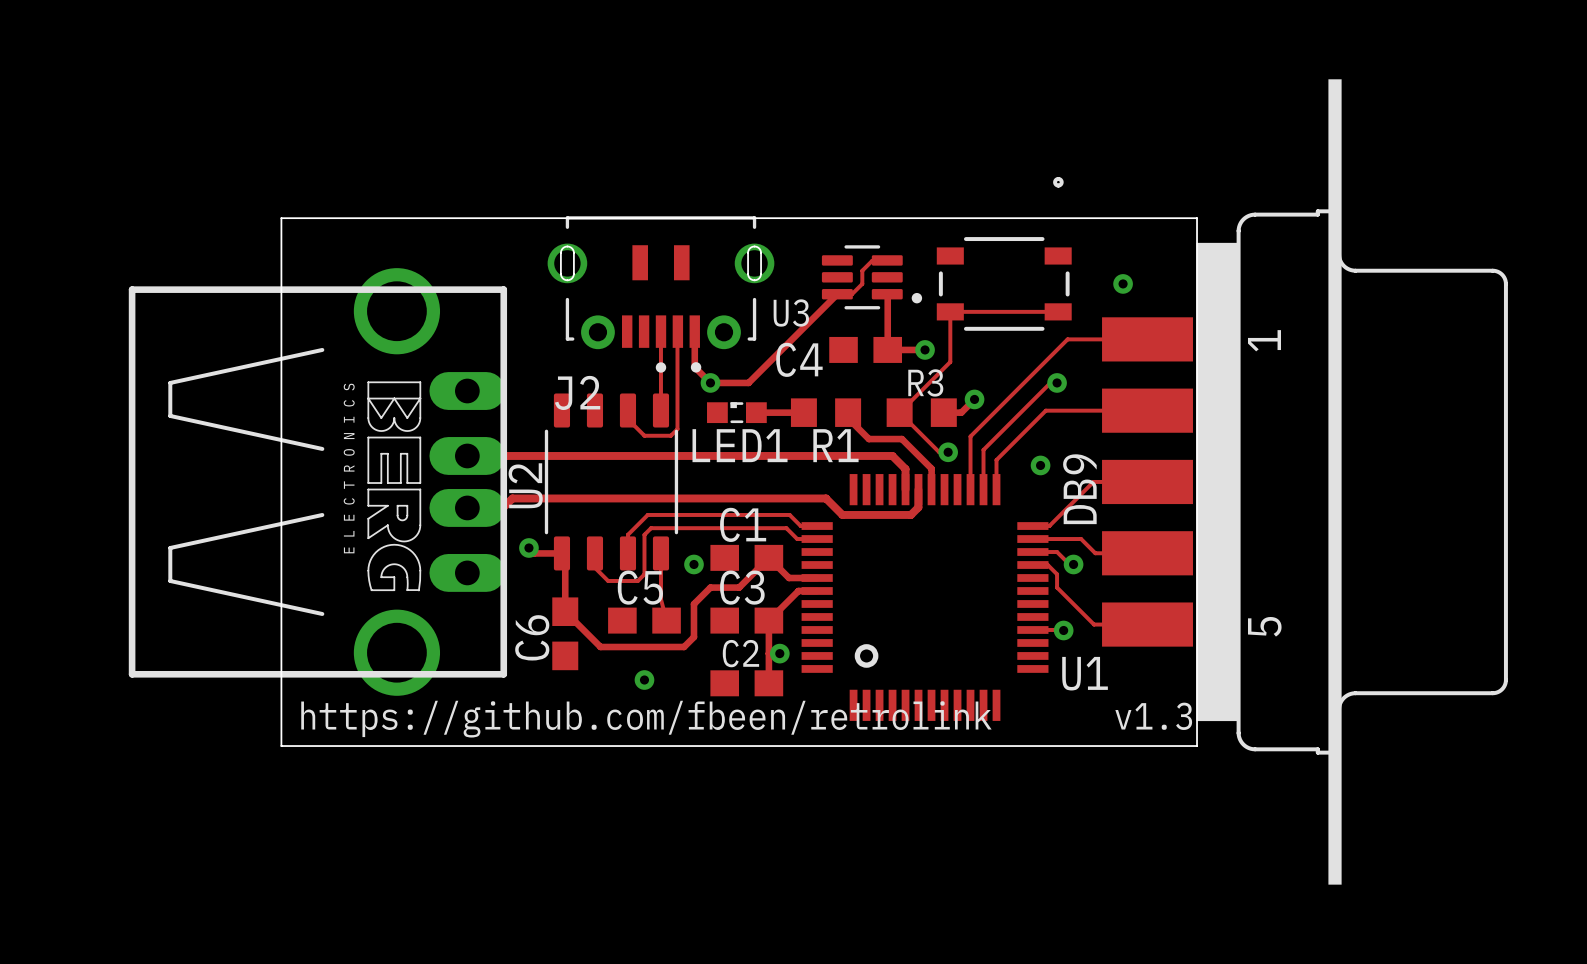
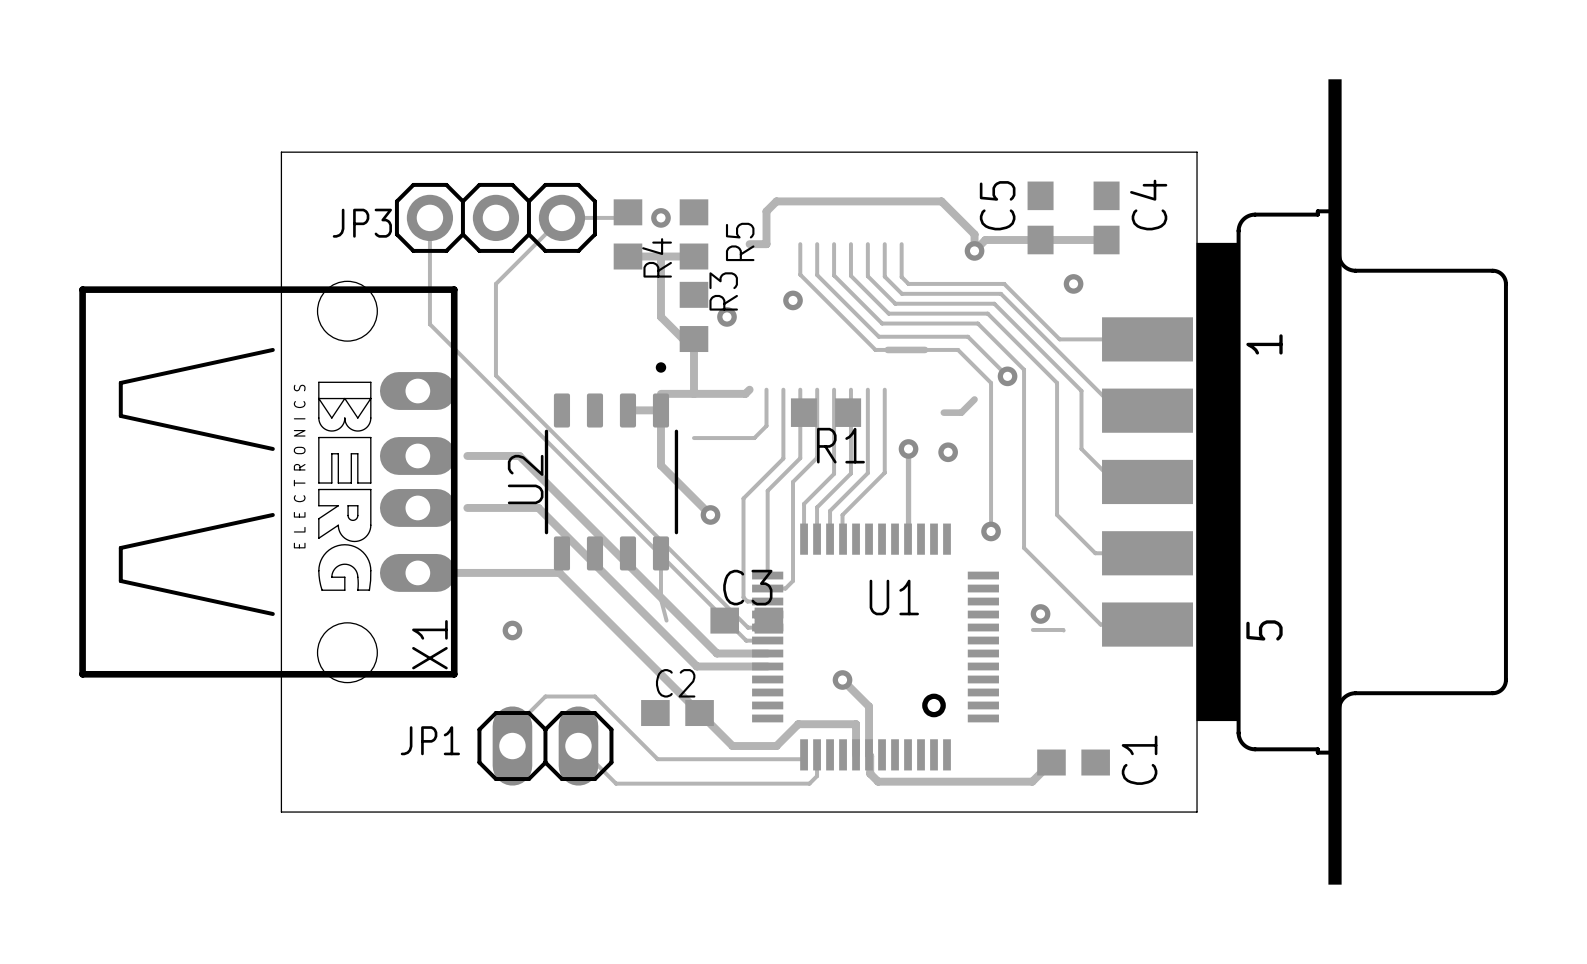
track: none -> (627, 212) (638, 217) (561, 217) (495, 283) (495, 375) (748, 627) (767, 627)
track: none -> (429, 217) (429, 324) (746, 640) (767, 640)
JP3: none -> (495, 217)
via: none -> (660, 217)
board edge: (281, 218) (1197, 218) -> (281, 218) (281, 152) (1197, 152) (1197, 218)
R4: none -> (627, 234)
R5: none -> (693, 234)
track: none -> (1106, 240) (985, 240) (974, 250) (974, 234) (941, 201) (776, 201) (766, 211) (766, 244) (749, 244)
track: none -> (817, 244) (817, 275) (878, 336) (967, 336) (1007, 376)
via: none -> (974, 250)
part: (1004, 253) -> none
track: none -> (627, 256) (693, 256)
track: none -> (660, 256) (660, 316) (683, 339) (693, 339) (693, 393)
track: (887, 260) (872, 260) (862, 270) (862, 283) (852, 294) (837, 294) (748, 382) (710, 382) (694, 367) (694, 331) -> none
U3: (872, 277) -> none
via position: (1123, 283) -> (1073, 283)
J2: (660, 294) -> none
track: (887, 294) (887, 349) -> (800, 244) (800, 274) (875, 349) (887, 349)
via: none -> (793, 300)
track: (1058, 311) (950, 311) (950, 361) (899, 412) (939, 452) (948, 452) -> none
via: none -> (726, 316)
track: (660, 331) (660, 393) -> (749, 389) (745, 393) (660, 393)
track: (677, 331) (677, 429) (670, 435) (644, 435) (627, 419) (627, 410) -> (660, 410) (627, 410)
track: (1067, 339) (970, 436) (970, 489) -> (1067, 339) (1059, 339) (1004, 283) (908, 283) (901, 277) (901, 244)
C4 rotation: 0° (865, 349) -> 90° clockwise (1106, 217)
C4 position: (865, 349) -> (1106, 217)
track: none -> (925, 349) (958, 349) (991, 382) (991, 531)
via: (925, 349) -> none
C4 name position: C4 (799, 359) -> C4 (1148, 205)
via: none -> (1007, 376)
via: (710, 382) -> none
track: (1057, 382) (1050, 382) (983, 449) (983, 489) -> none
via: (1057, 382) -> none
track: none -> (766, 389) (766, 425) (754, 438) (693, 438)
track: none -> (783, 389) (783, 458) (743, 498) (743, 597) (747, 601) (767, 601)
track: none -> (800, 389) (800, 458) (767, 490) (767, 575)
track: none -> (817, 389) (817, 457) (793, 481) (793, 580) (785, 588) (767, 588)
track: none -> (834, 389) (834, 473) (804, 503) (804, 539)
track: none -> (867, 389) (867, 473) (830, 510) (830, 539)
track: none -> (884, 389) (884, 472) (842, 514) (843, 539)
via: (974, 399) -> none
track: none -> (660, 410) (660, 465) (710, 514)
track: (1117, 410) (1045, 410) (996, 460) (996, 489) -> (1117, 410) (1000, 293) (901, 293) (884, 276) (884, 244)
LED1: (736, 412) -> none
track: (756, 412) (803, 412) -> none
track: (848, 412) (848, 418) (868, 439) (901, 439) (931, 468) (931, 489) -> none
R3 rotation: 0° (921, 412) -> 90° clockwise (693, 316)
R3 position: (921, 412) -> (693, 316)
track: none -> (908, 448) (908, 539)
via: none -> (908, 448)
track: (519, 455) (892, 455) (905, 469) (905, 489) -> (519, 455) (716, 653) (767, 653)
via: (1040, 465) -> none
X1: none -> (268, 481)
part: (317, 481) -> none
track: (1114, 481) (1093, 481) (1049, 526) (1032, 526) -> (1114, 481) (1081, 448) (1081, 390) (994, 303) (895, 303) (867, 276) (867, 244)
track: (918, 489) (918, 507) (910, 514) (842, 514) (826, 498) (512, 498) (502, 507) -> (767, 666) (696, 666) (538, 507) (502, 507)
text: DB9 (1079, 489) -> none
C1 name rotation: 0° (743, 524) -> 90° counterclockwise (1139, 760)
track: (817, 526) (800, 526) (789, 514) (647, 514) (627, 534) (627, 553) -> none
via: none -> (991, 531)
track: (817, 539) (797, 539) (786, 528) (651, 528) (644, 534) (644, 574) (637, 580) (608, 580) (594, 567) (594, 553) -> (817, 539) (817, 507) (850, 473) (850, 389)
track: (1032, 539) (1081, 539) -> (850, 244) (850, 275) (888, 313) (987, 313) (1057, 382) (1057, 514) (1081, 539)
track: (528, 547) (534, 553) (561, 553) (565, 556) (565, 611) (600, 647) (684, 647) (693, 637) (693, 604) (710, 587) (739, 587) (768, 557) (789, 578) (817, 578) -> none
via: (528, 547) -> none
track: (1032, 552) (1057, 552) (1069, 564) (1073, 564) -> none
C1 position: (746, 557) -> (1073, 762)
via position: (693, 564) -> (710, 514)
via: (1073, 564) -> none
track: (1032, 565) (1047, 564) (1057, 574) (1057, 587) (1094, 624) (1100, 624) -> (834, 244) (834, 275) (882, 323) (977, 323) (1024, 369) (1024, 547) (1100, 624)
track: none -> (417, 572) (559, 572) (732, 746) (776, 746) (798, 724) (856, 724) (856, 754)
C5 name position: C5 (640, 587) -> C5 (997, 205)
track: (817, 590) (798, 590) (768, 620) (768, 683) -> none
U1 rotation: 0° (925, 597) -> 90° counterclockwise (875, 647)
C5 rotation: 0° (644, 620) -> 90° clockwise (1040, 217)
C5 position: (644, 620) -> (1040, 217)
via: none -> (512, 630)
via position: (1063, 630) -> (1040, 613)
C6: (565, 633) -> none
via position: (779, 653) -> (842, 680)
U1 name position: U1 (1085, 673) -> U1 (894, 597)
via: (644, 680) -> none
track: none -> (842, 680) (869, 706) (870, 773) (878, 781) (1032, 781) (1051, 762)
C2 position: (746, 683) -> (677, 713)
text: v1.3 (1153, 716) -> none
text: https://github.com/fbeen/retrolink (646, 719) -> none
board edge: (281, 746) (1197, 746) -> (281, 746) (281, 812) (1197, 812) (1197, 746)
track: none -> (512, 746) (512, 729) (545, 696) (594, 696) (657, 759) (804, 759) (804, 754)
JP1: none -> (545, 746)
track: none -> (578, 746) (616, 783) (809, 783) (817, 776) (817, 754)

